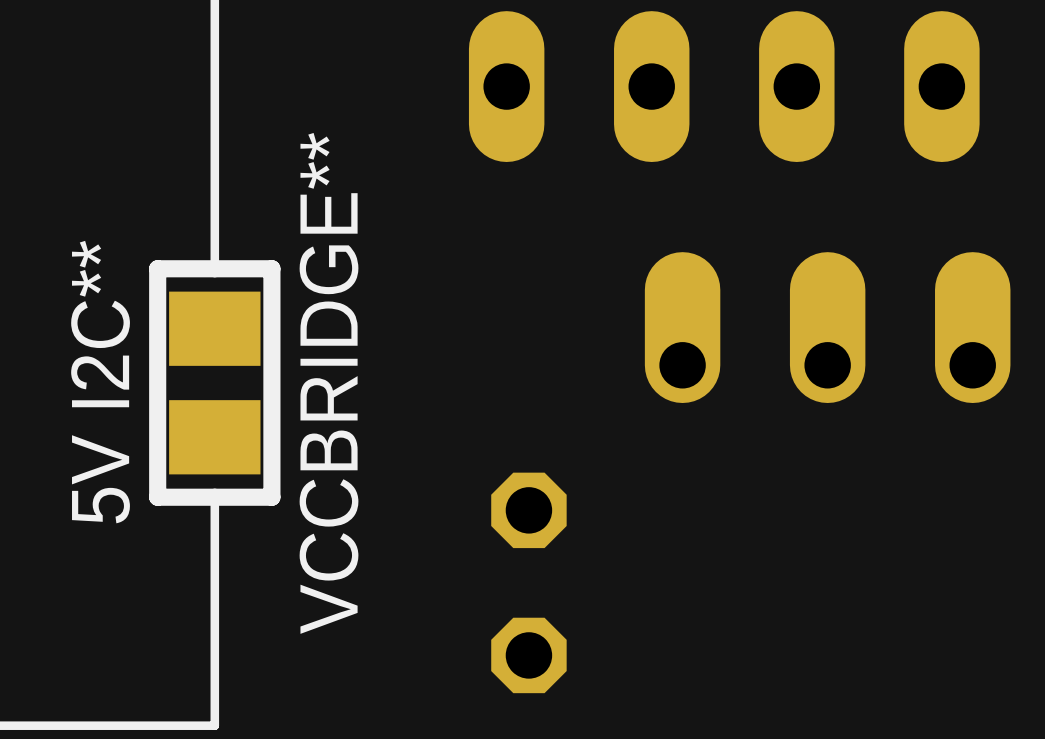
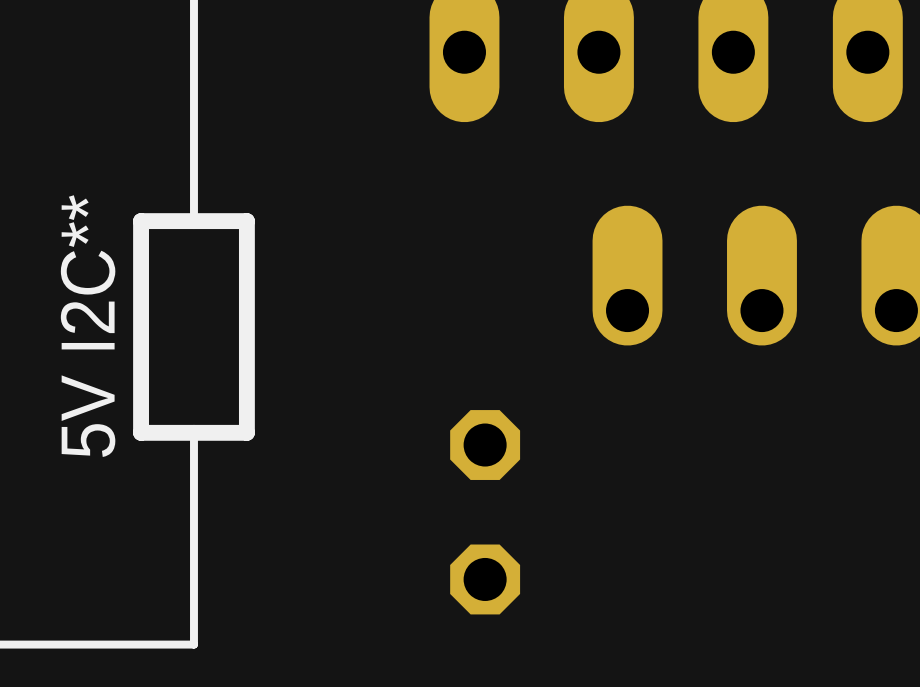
VCCBRIDGE**: (214, 383) -> none

